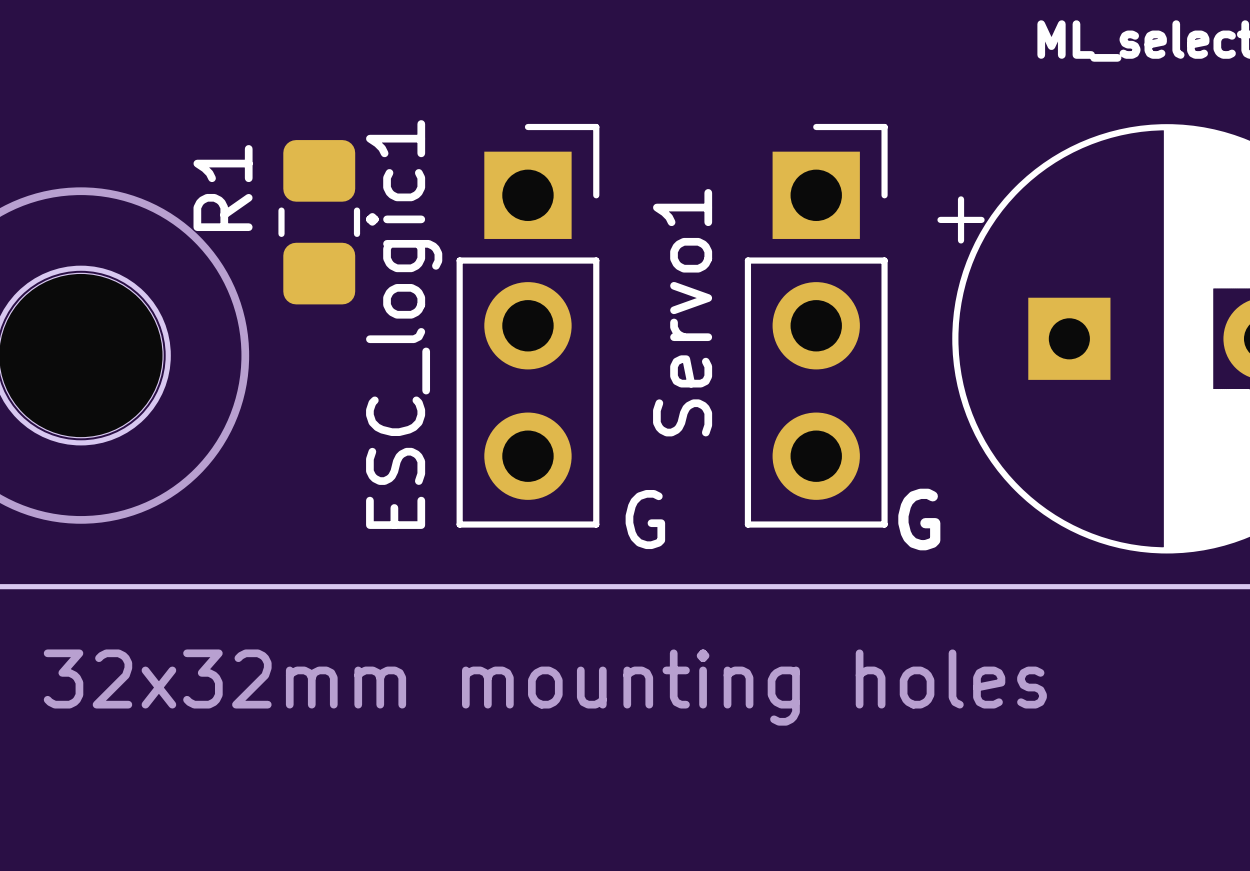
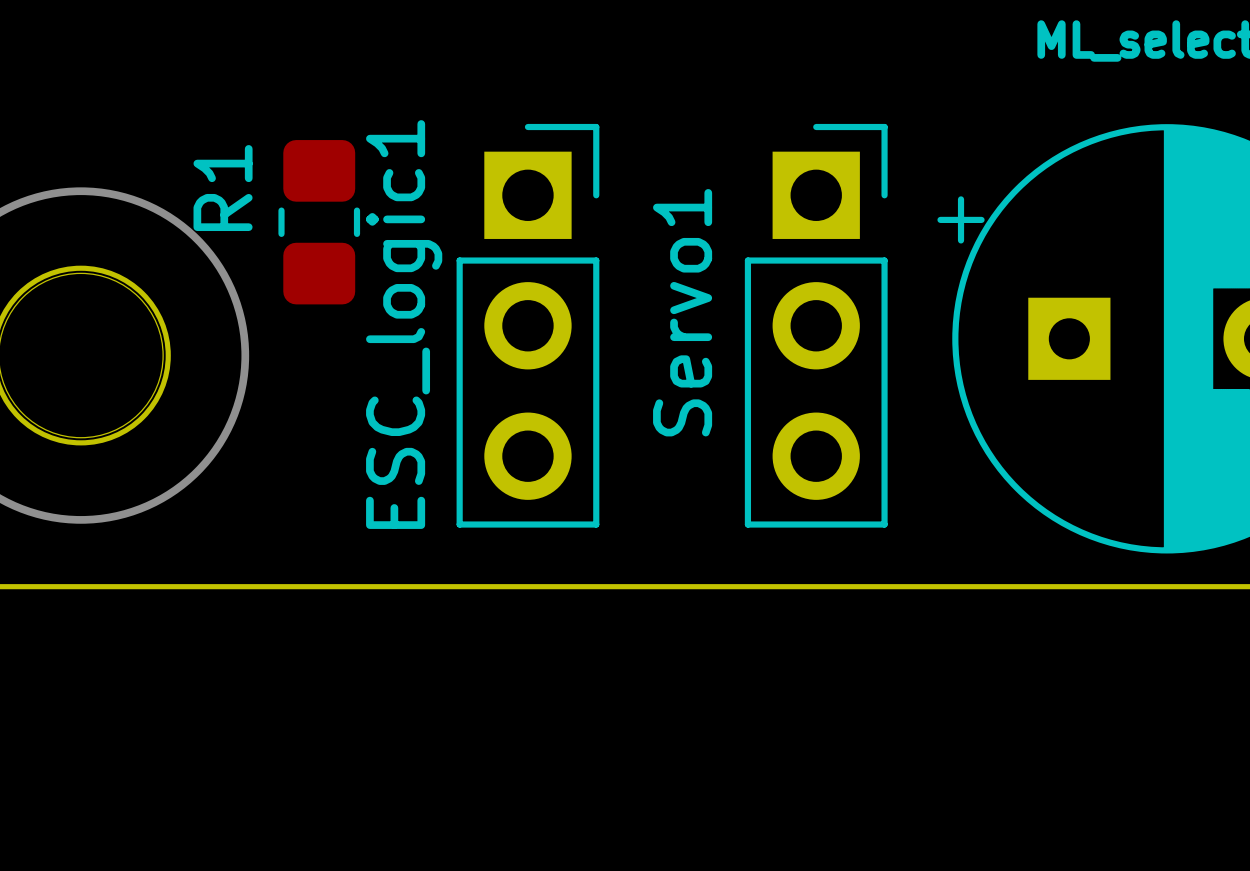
text: G (645, 519) -> none
text: G (919, 519) -> none
text: 32x32mm mounting holes (545, 687) -> none

